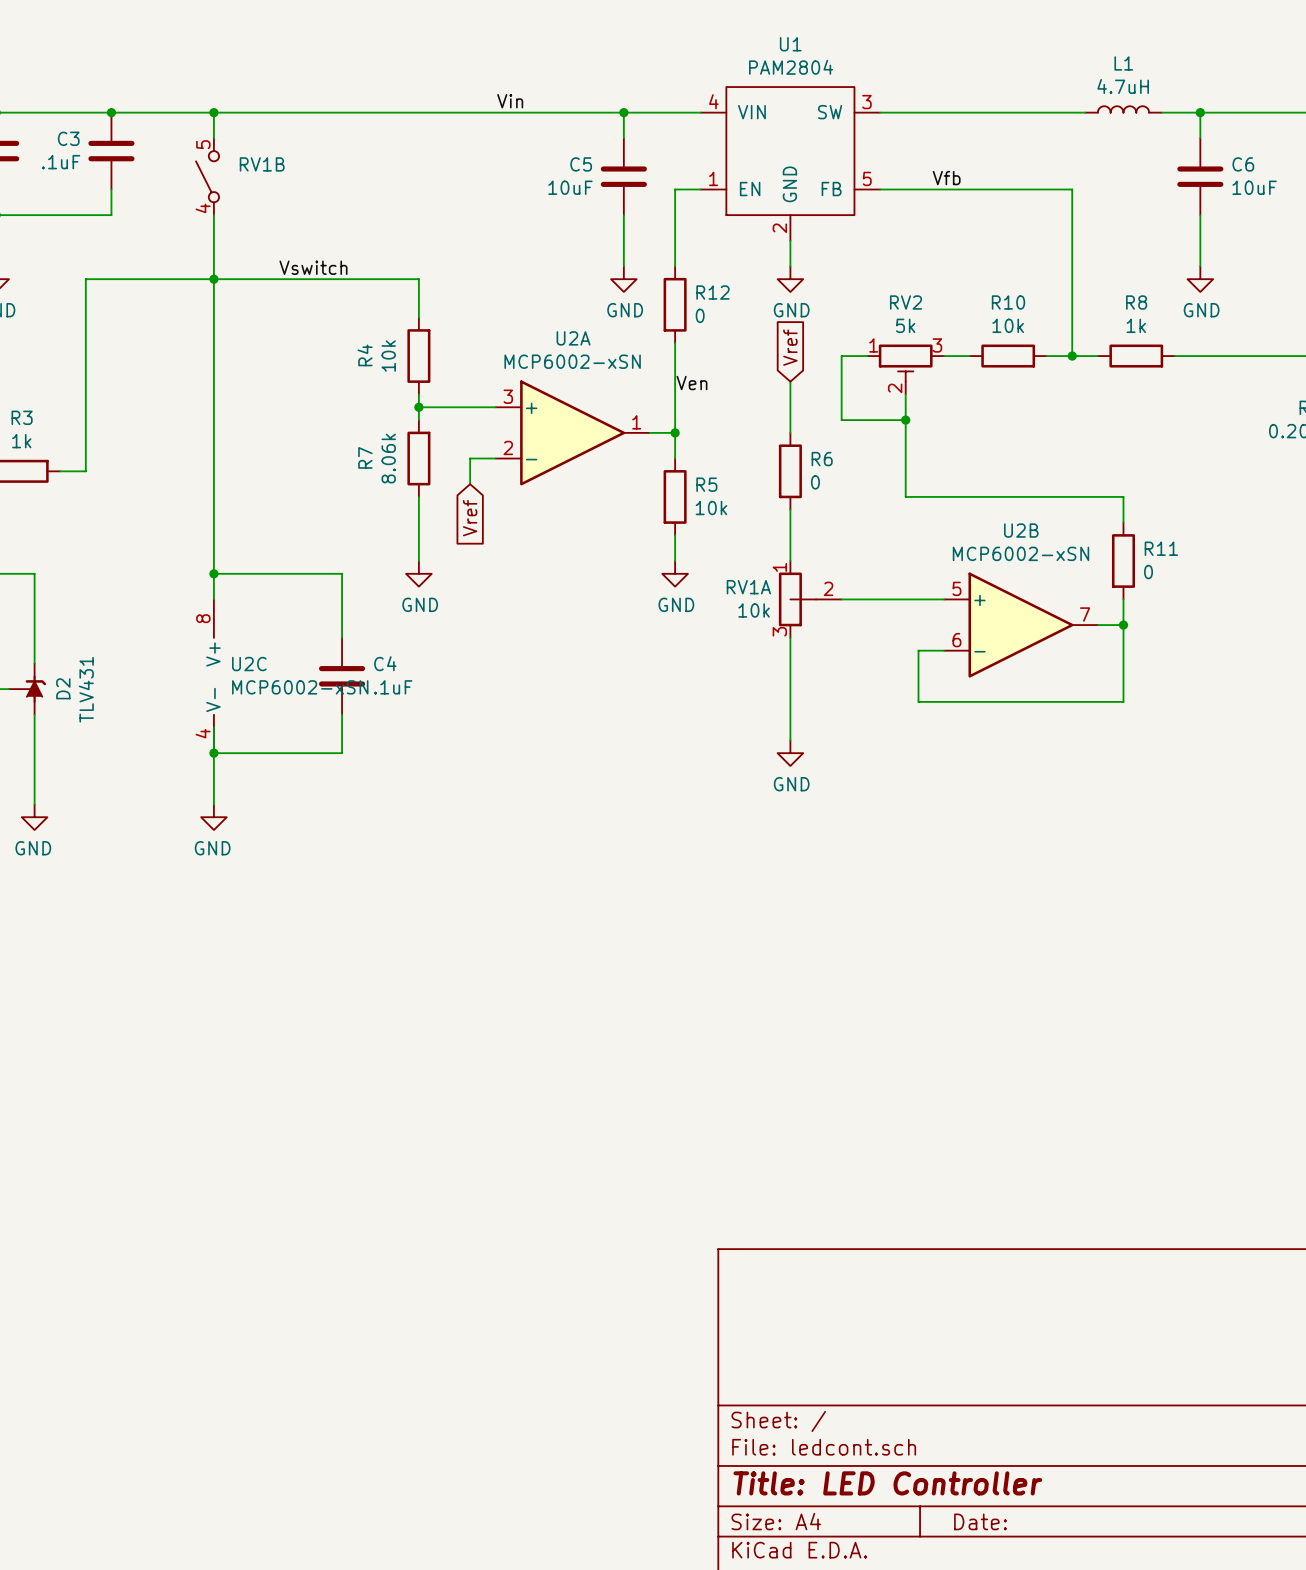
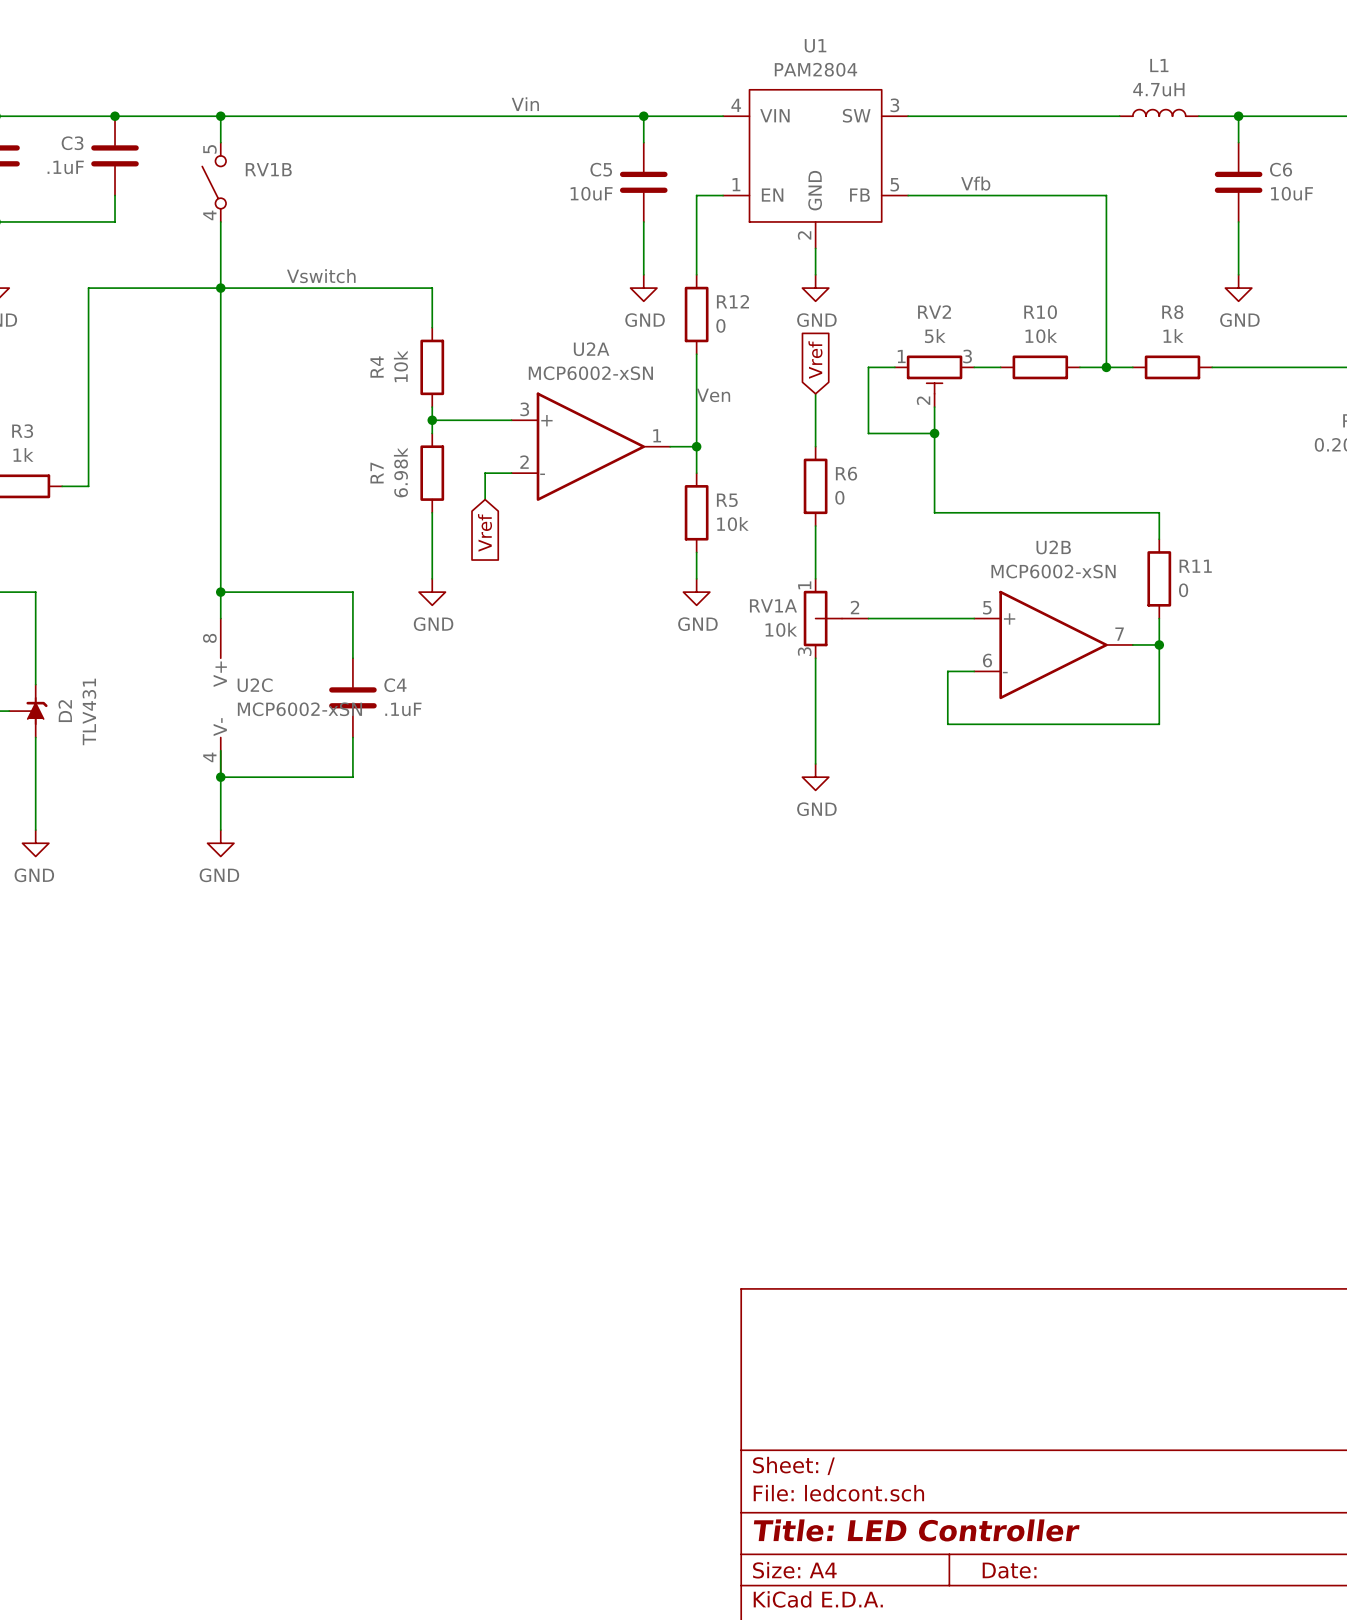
R7 value: 8.06k (388, 458) -> 6.98k (400, 472)

